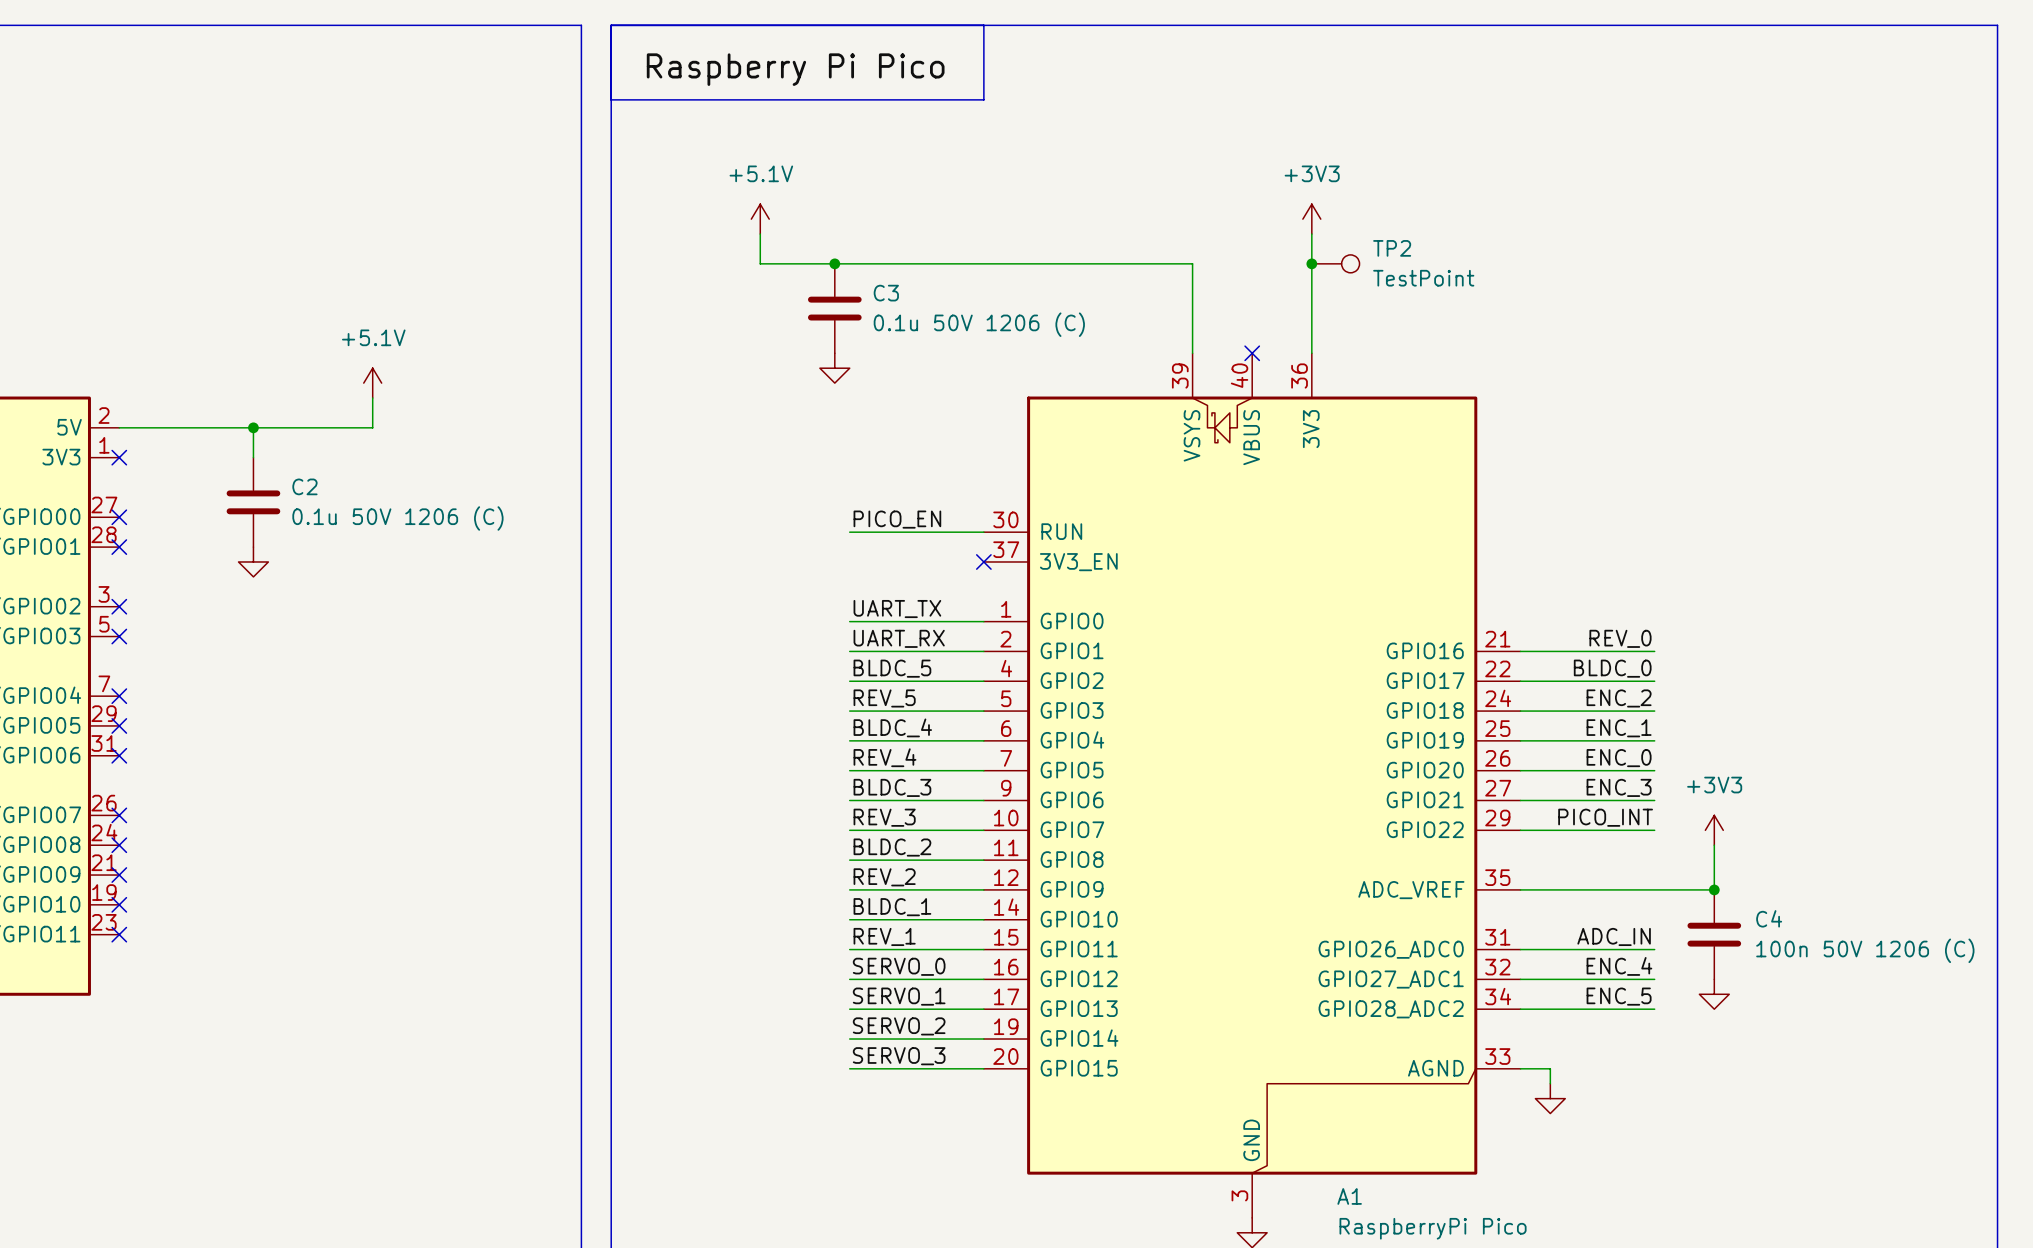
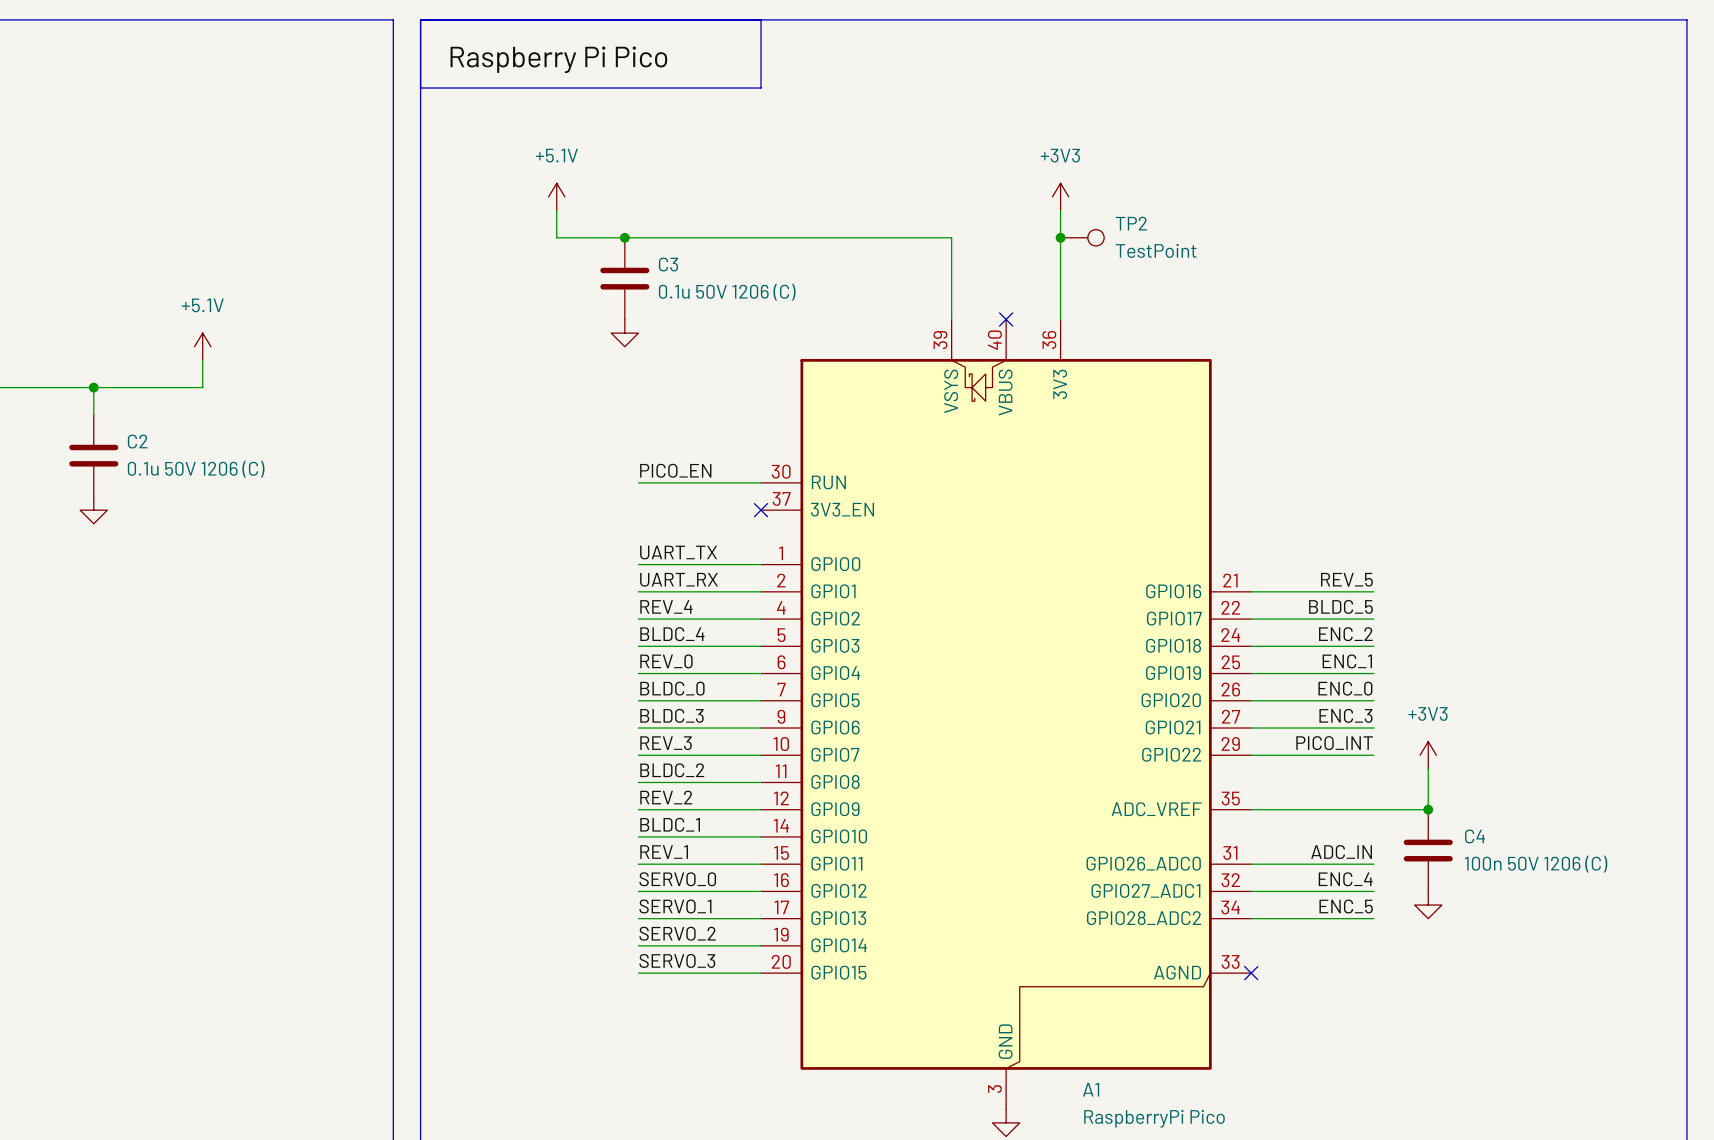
label: REV_0 (1620, 638) -> REV_5 (1346, 579)
label: BLDC_5 (892, 668) -> REV_4 (666, 606)
label: BLDC_0 (1612, 668) -> BLDC_5 (1340, 606)
label: REV_5 (884, 698) -> BLDC_4 (672, 634)
label: BLDC_4 (892, 727) -> REV_0 (666, 661)
label: REV_4 (884, 757) -> BLDC_0 (672, 688)
wire: (1520, 1068) (1550, 1068) (1550, 1083) -> none
no-connect mark: none -> (1251, 973)
power symbol: (1550, 1098) -> none

